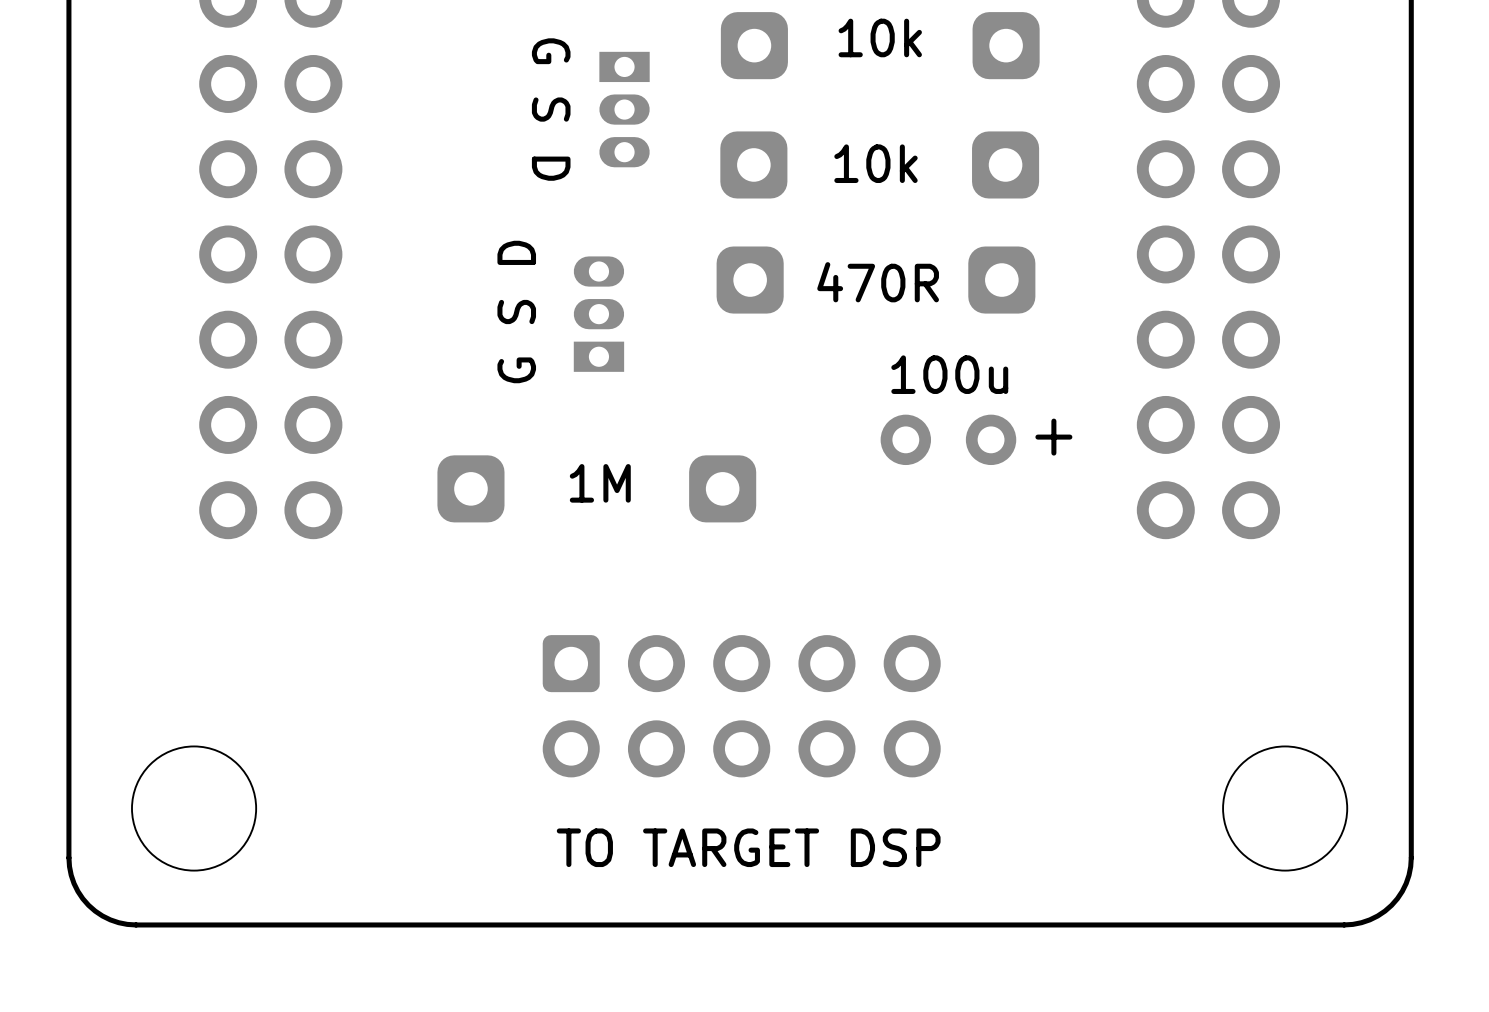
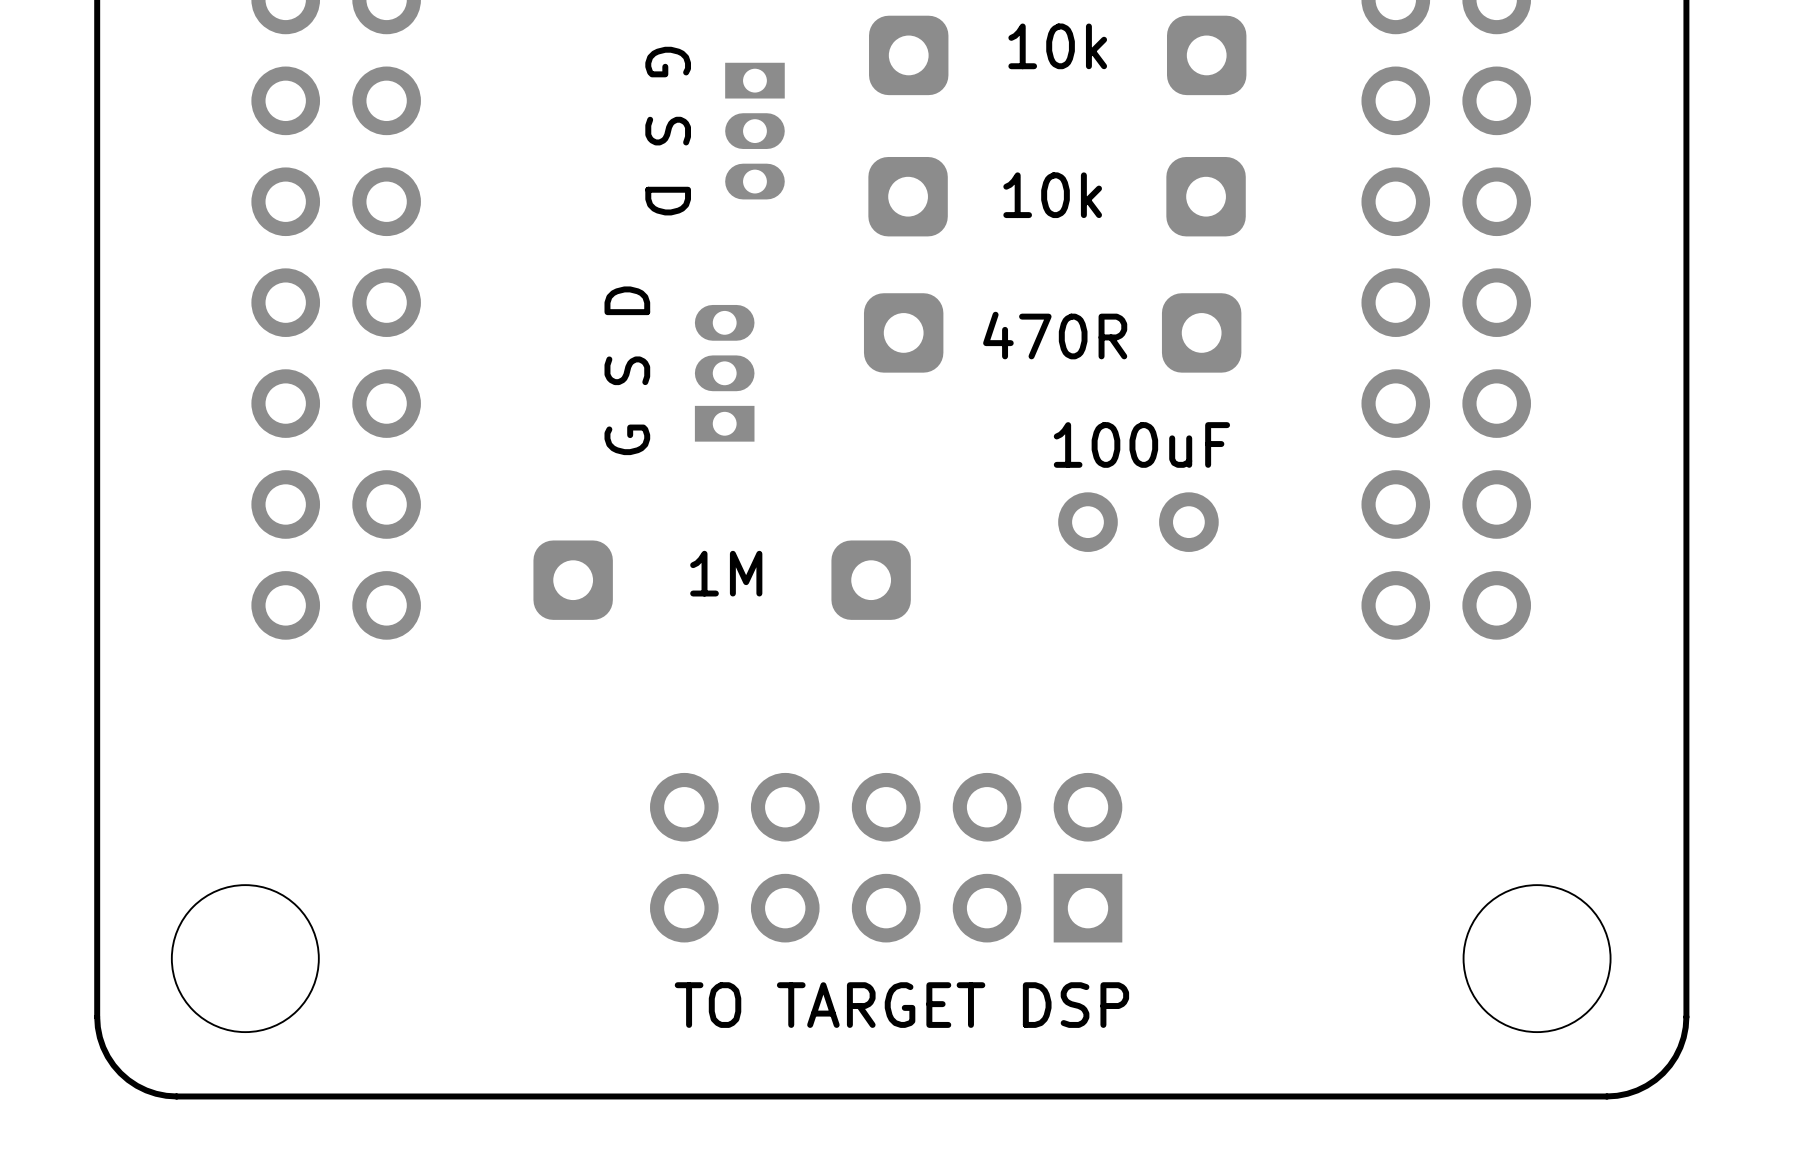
part value: 100u (949, 374) -> 100uF (1141, 444)
text: + (1053, 437) -> none
part footprint: [542, 635, 941, 778] -> [650, 772, 1123, 943]

